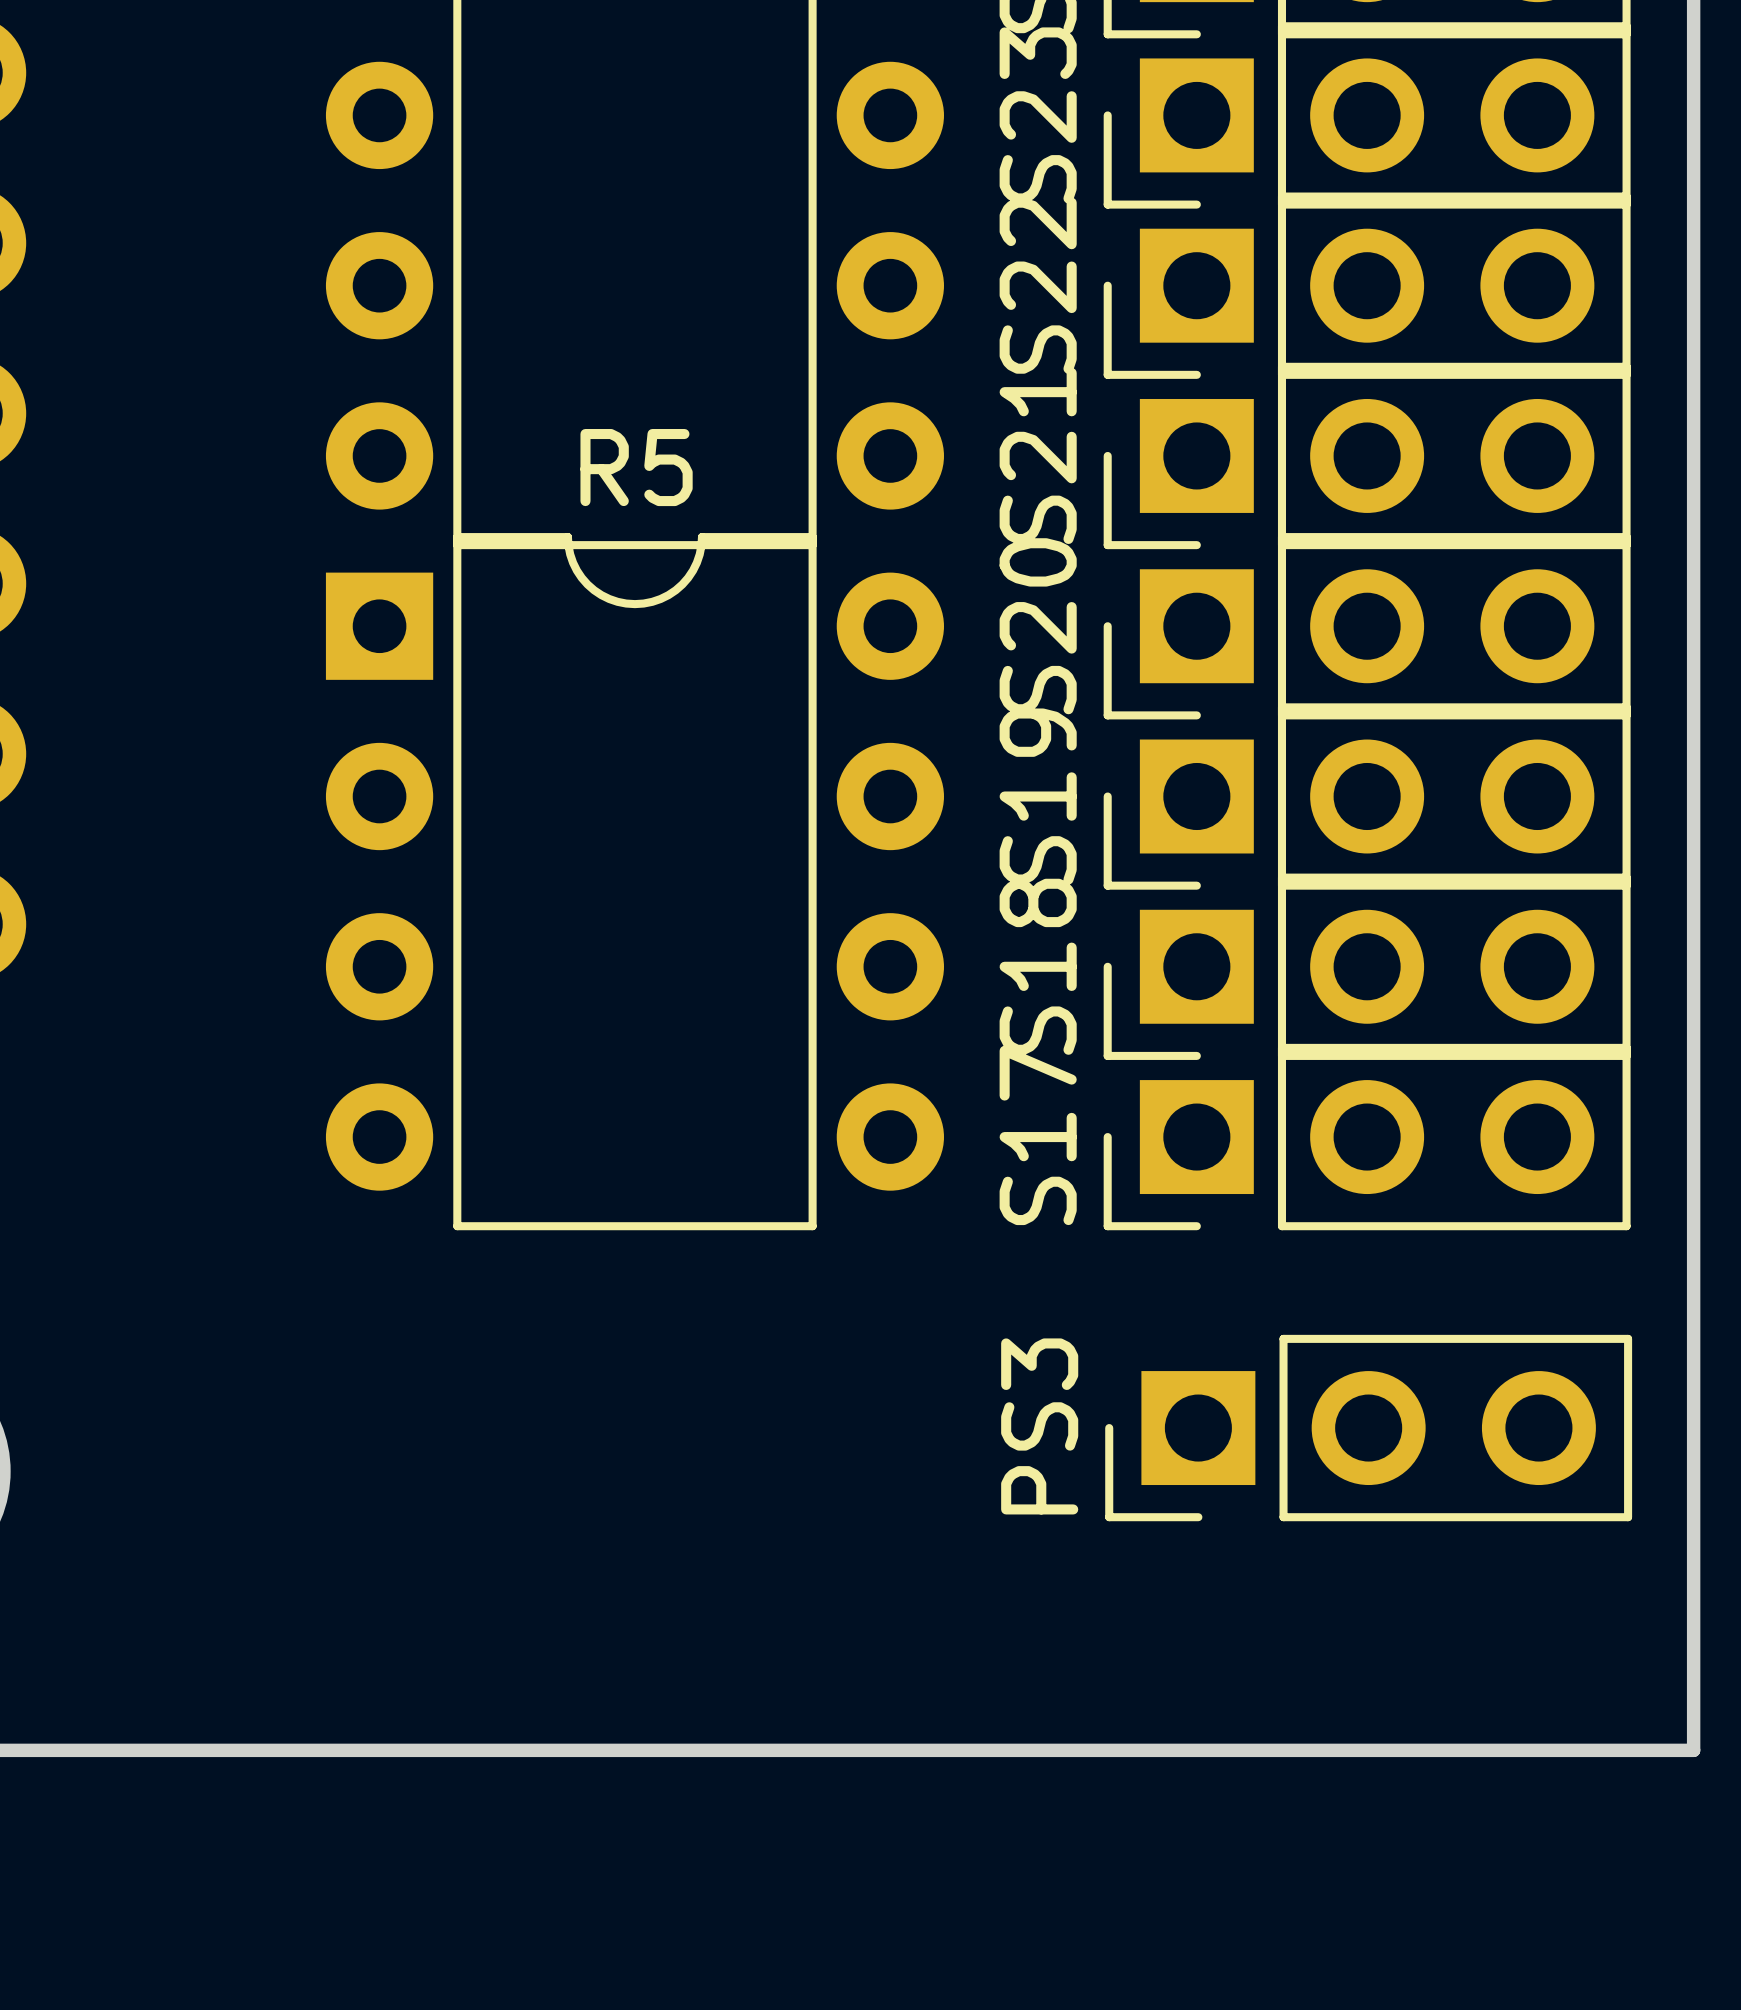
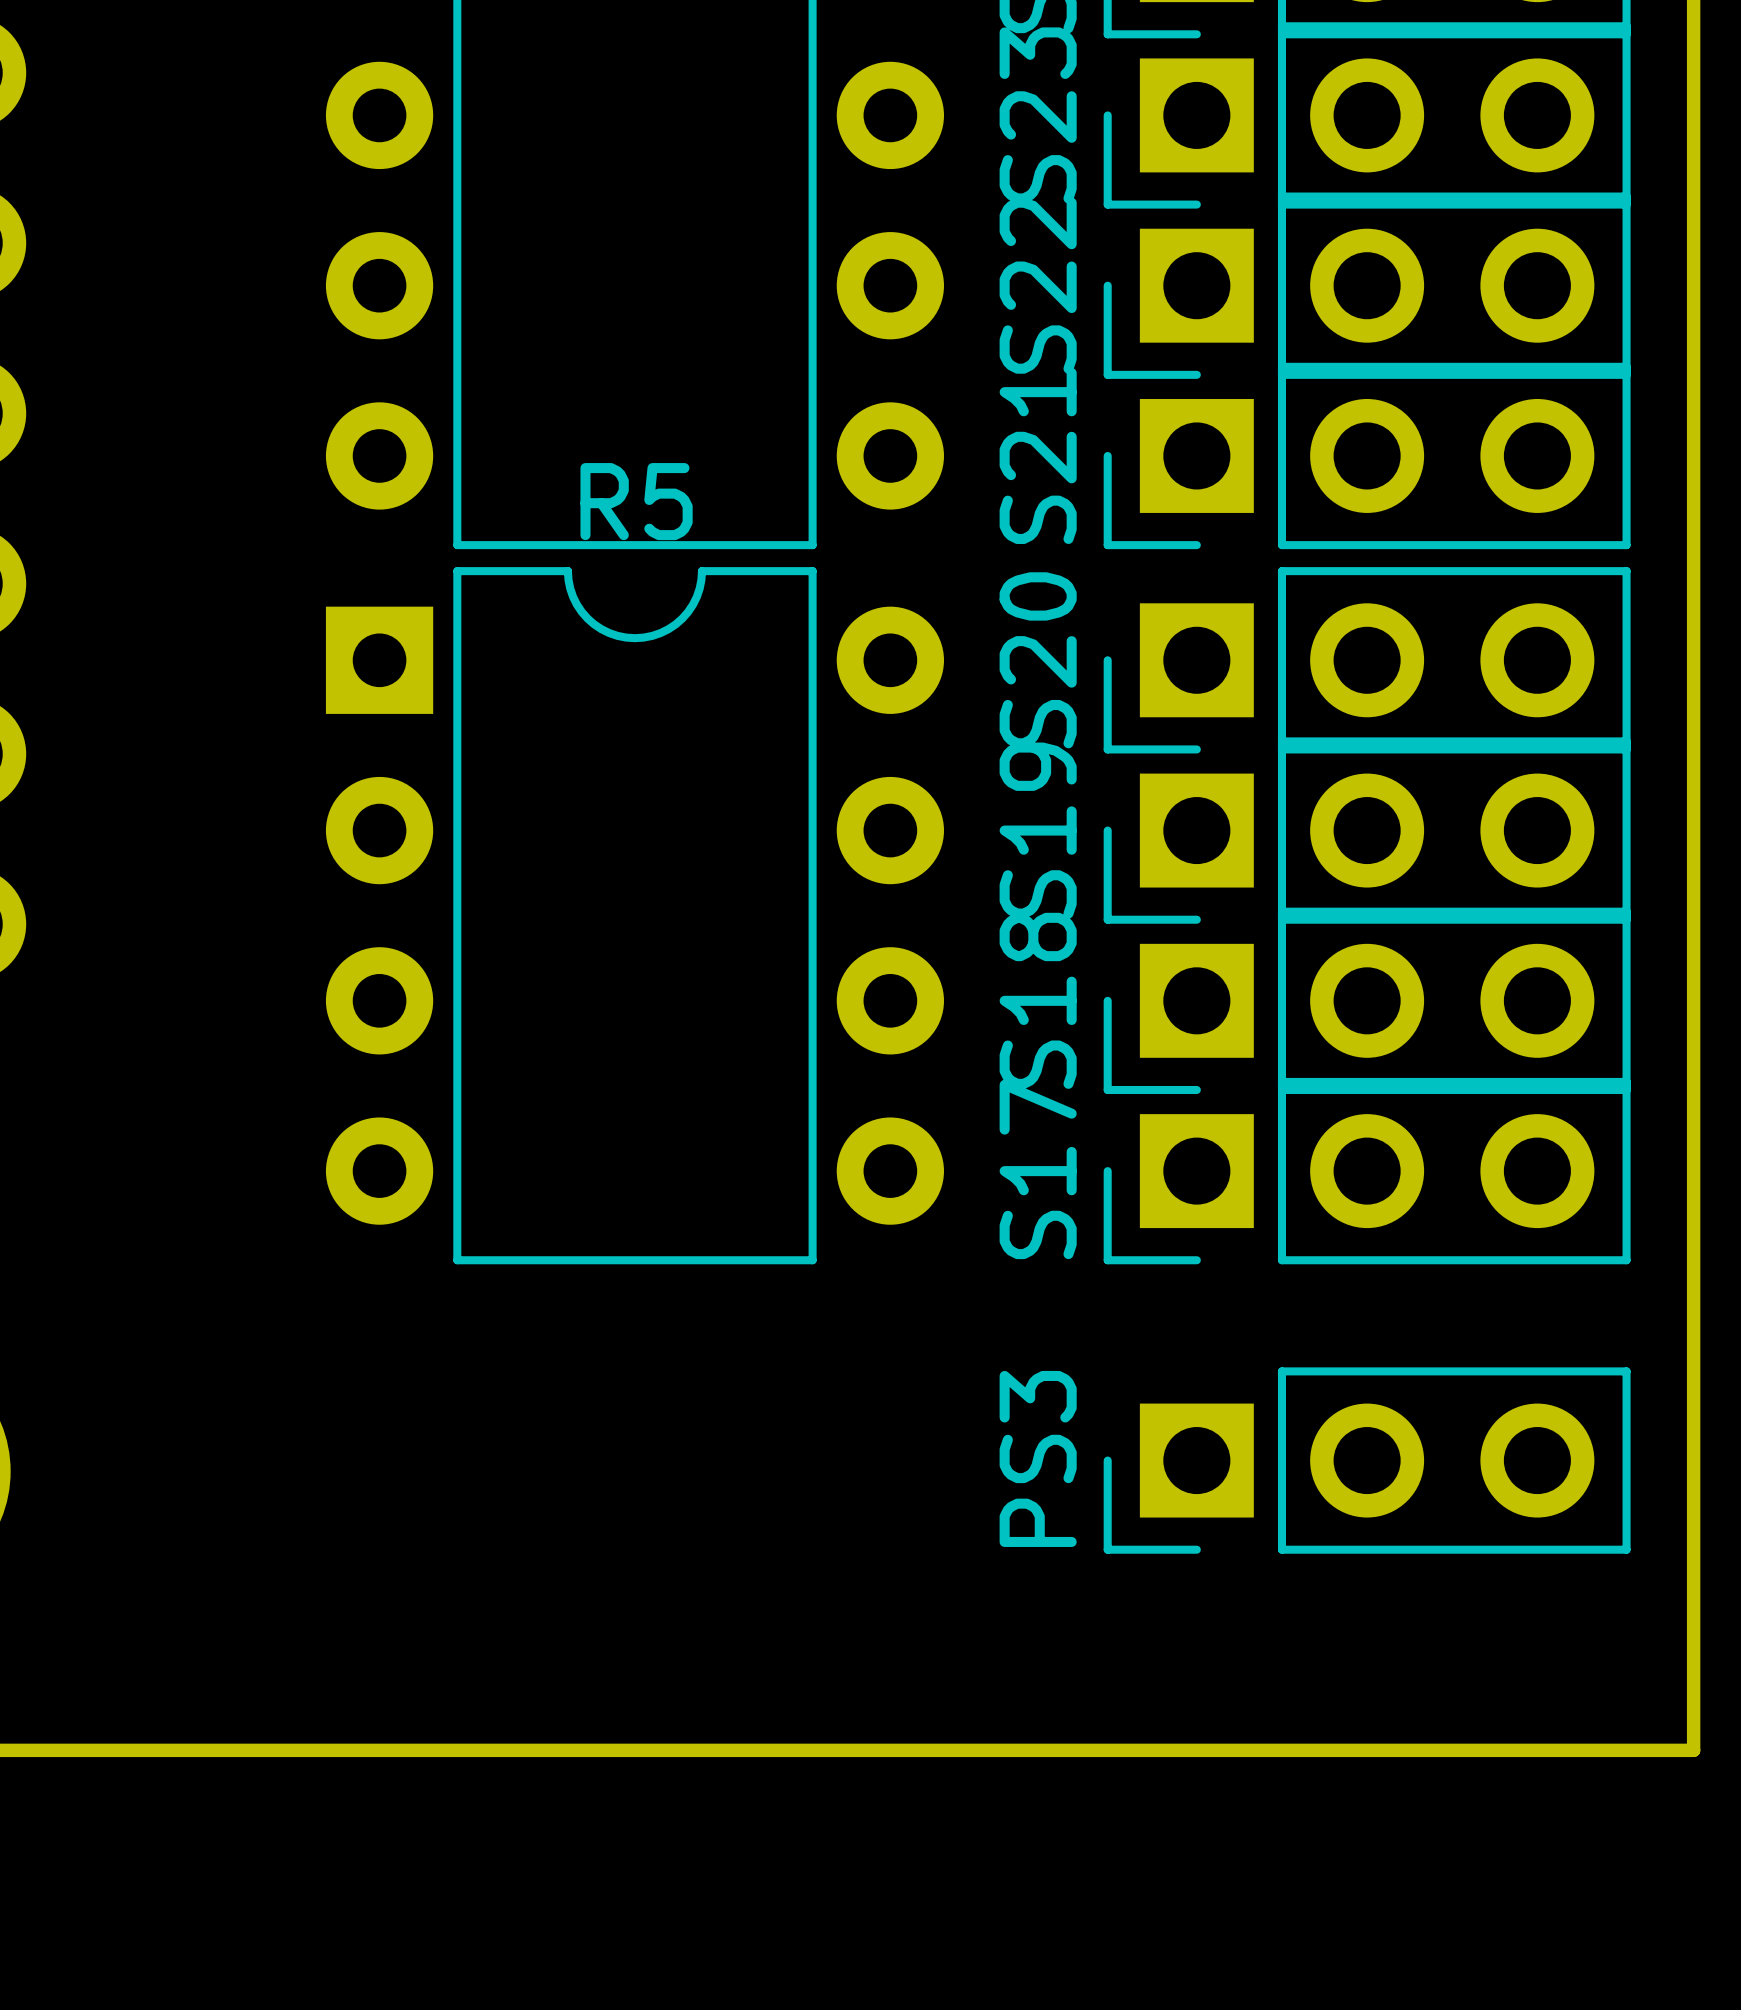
S20 position: (1367, 626) -> (1367, 660)
S19 position: (1367, 796) -> (1367, 830)
R5 position: (634, 881) -> (634, 915)
S18 position: (1367, 966) -> (1367, 1000)
S17 position: (1367, 1137) -> (1367, 1171)
PS3 position: (1368, 1428) -> (1367, 1460)

